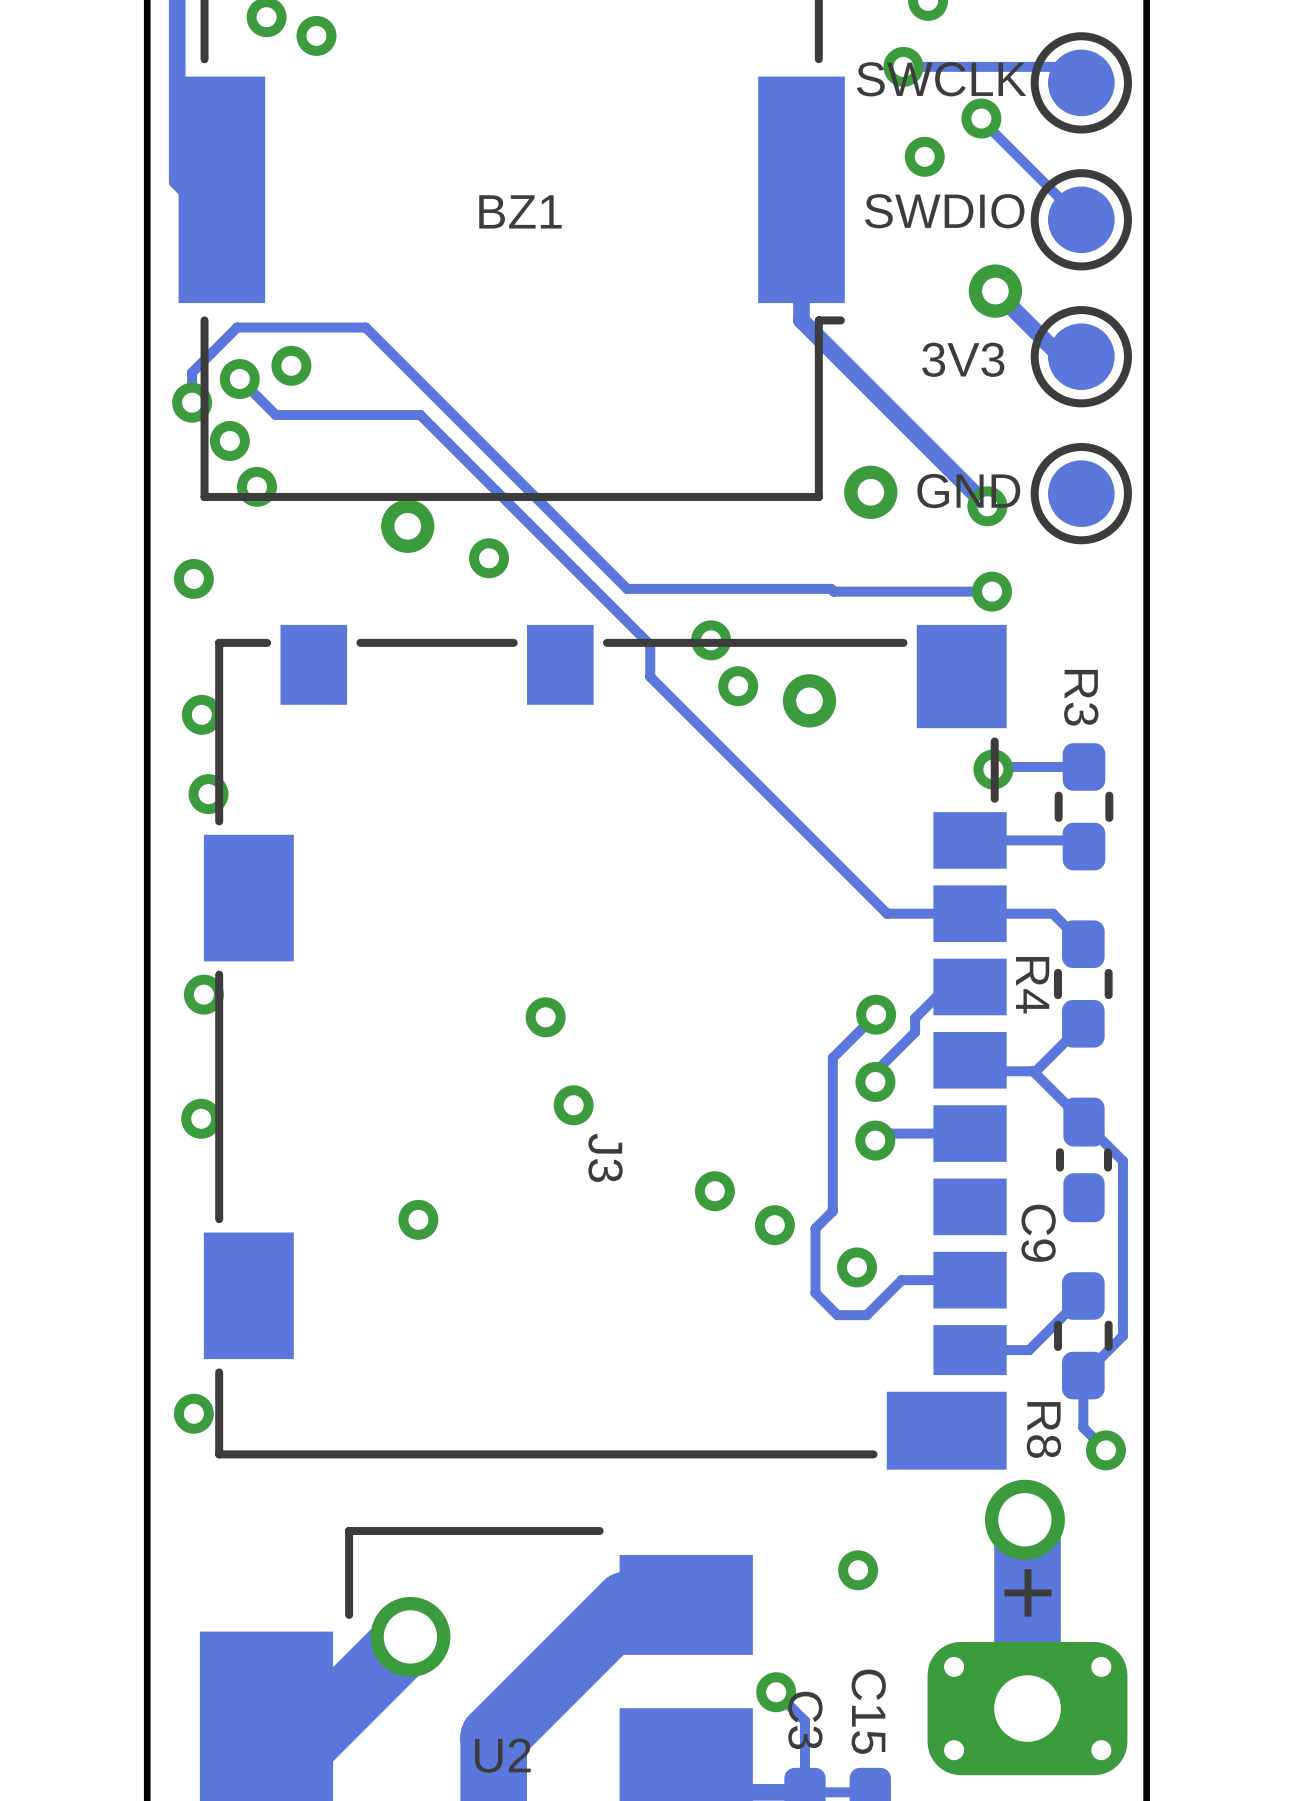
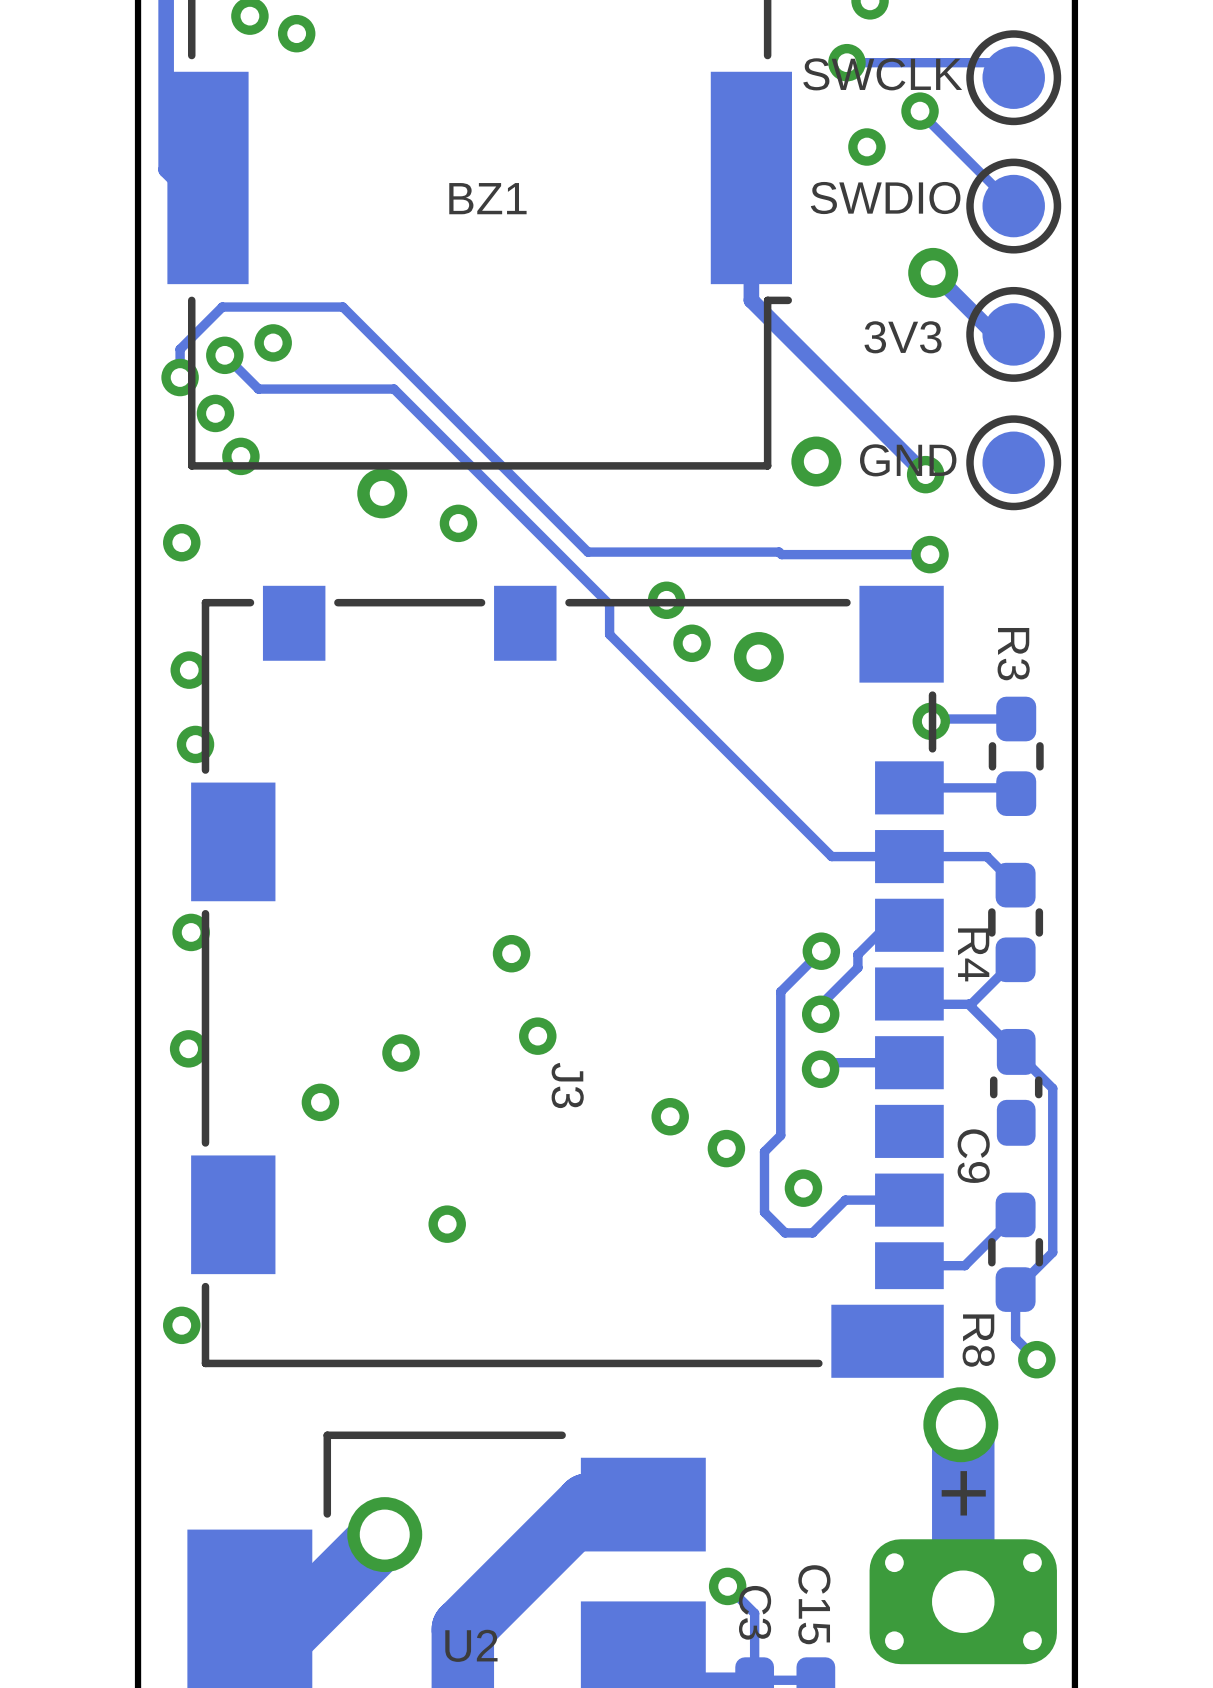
R4 name position: R4 (1032, 985) -> R4 (973, 954)
via: none -> (400, 1053)
via: none -> (320, 1102)
via: (418, 1219) -> none
via: none -> (447, 1224)
via: (858, 1570) -> none

